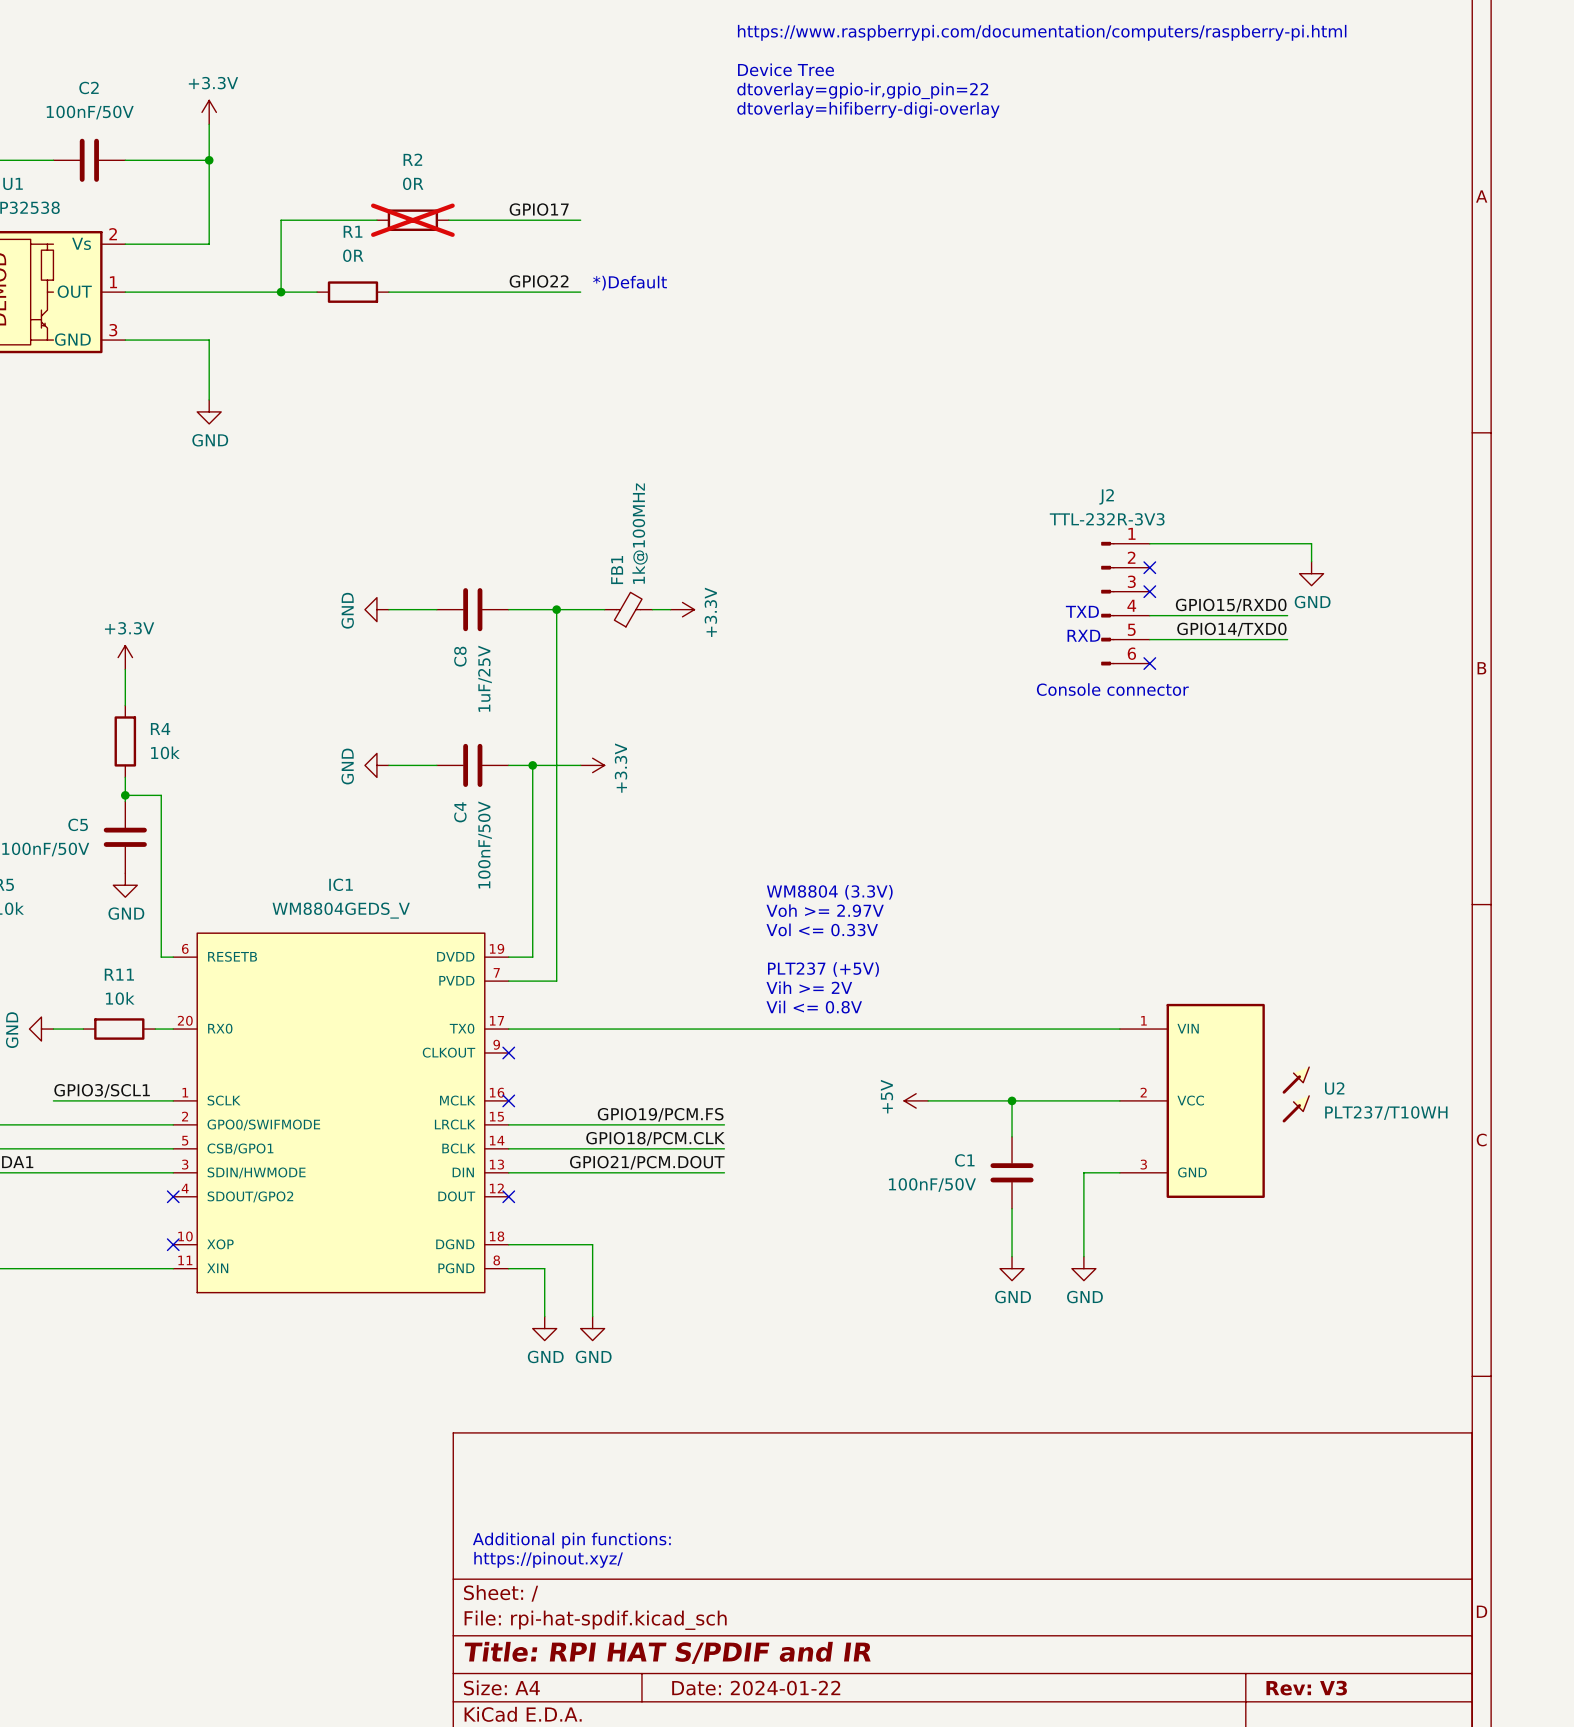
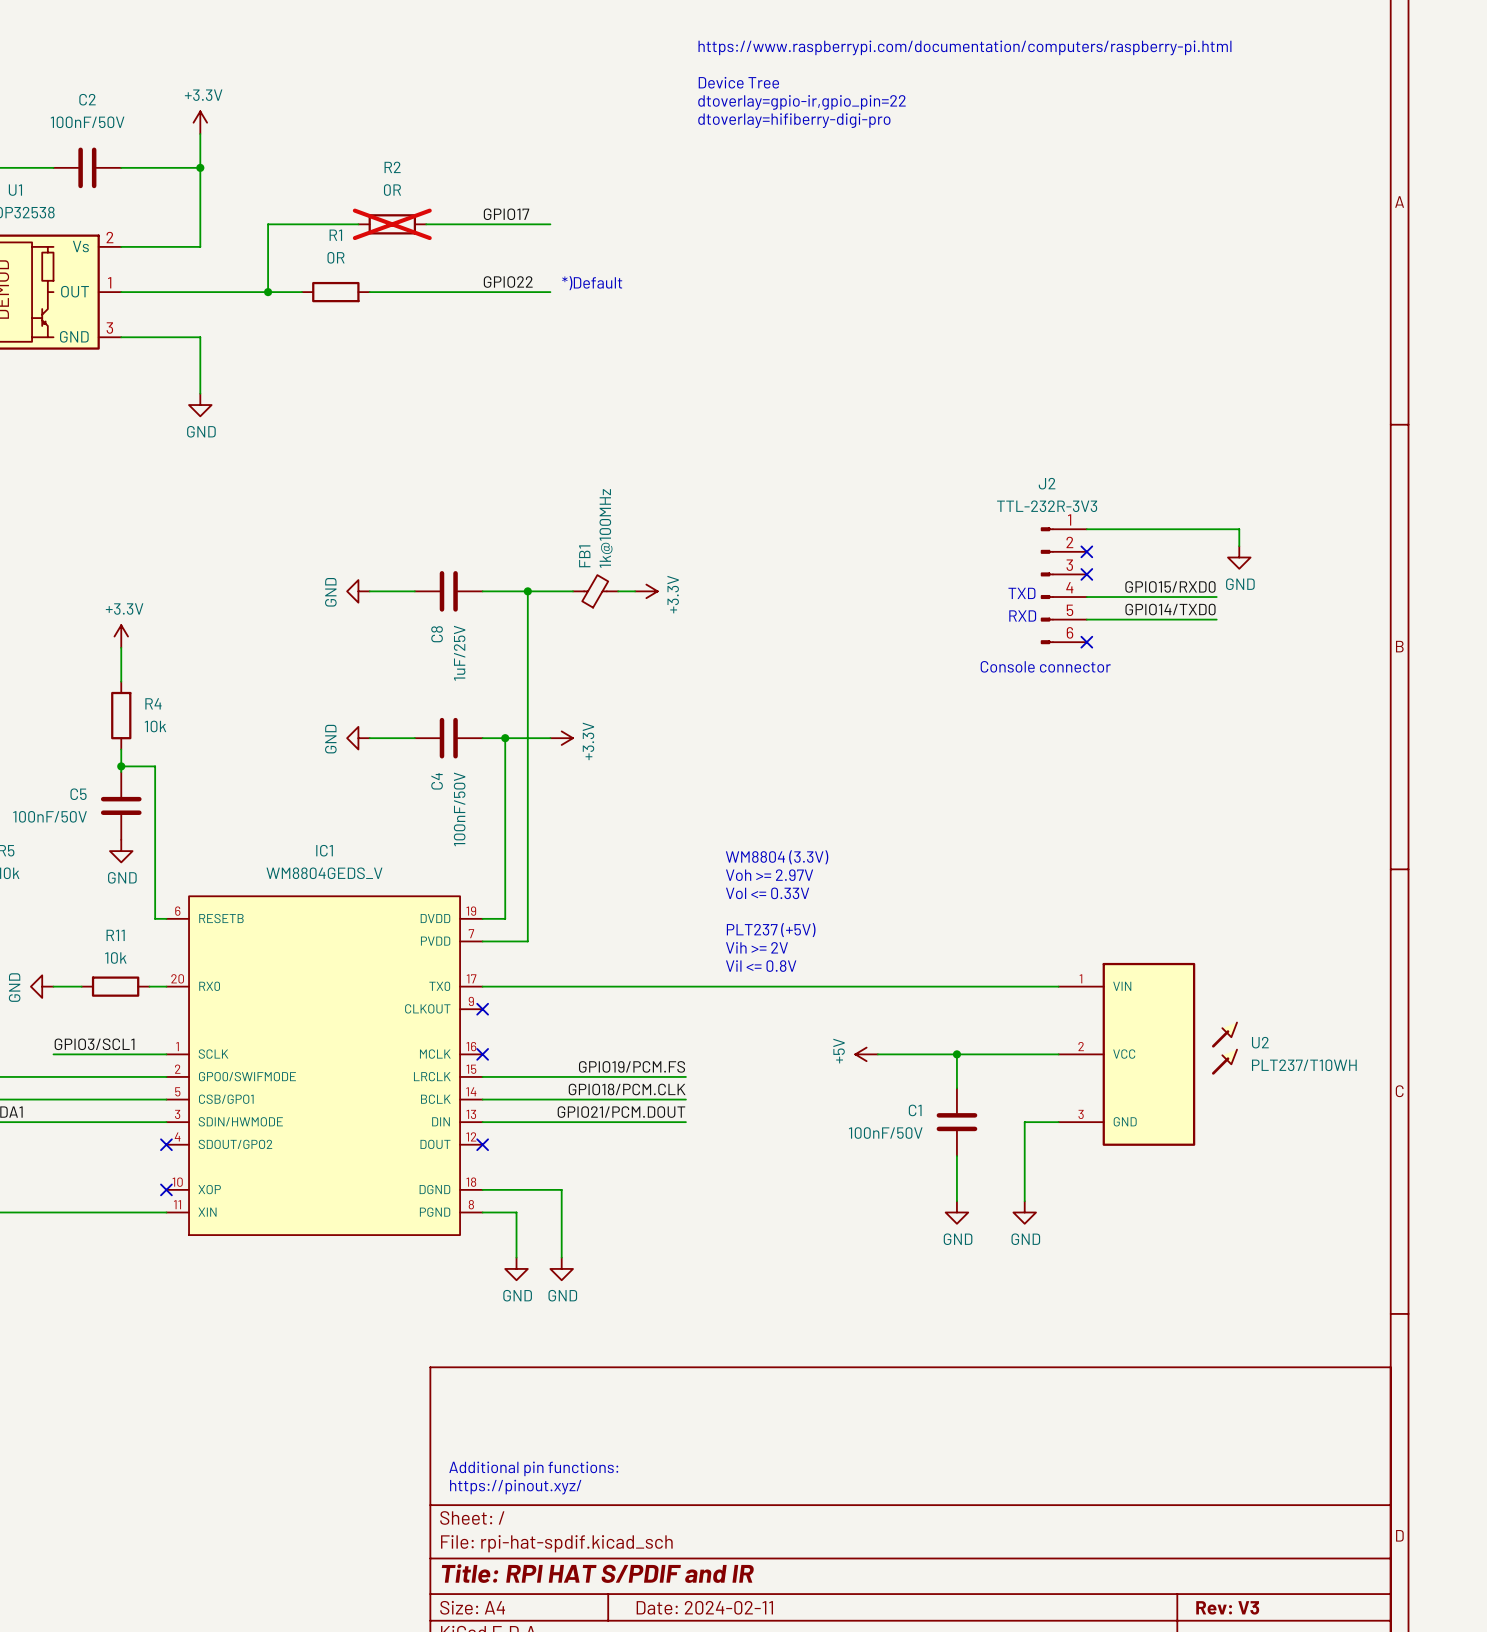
text: dtoverlay=hifiberry-digi-overlay (868, 110) -> dtoverlay=hifiberry-digi-pro (794, 120)
title block: Date: 2024-01-22 (756, 1688) -> Date: 2024-02-11 (704, 1607)

